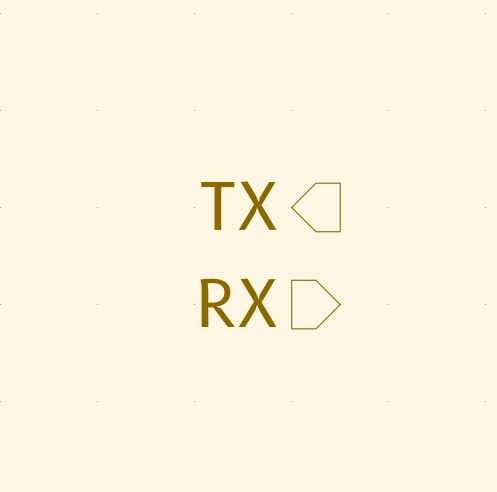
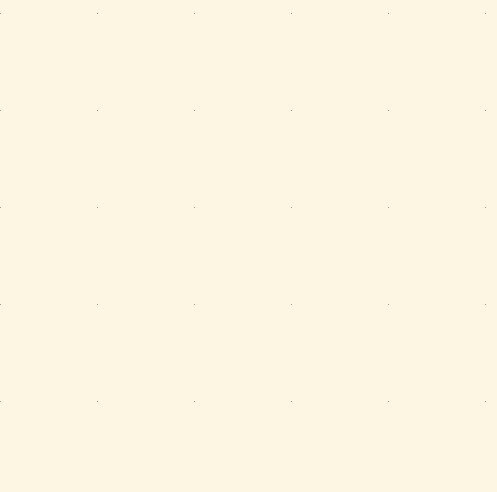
hierarchical label: TX (238, 205) -> none
hierarchical label: RX (238, 302) -> none

